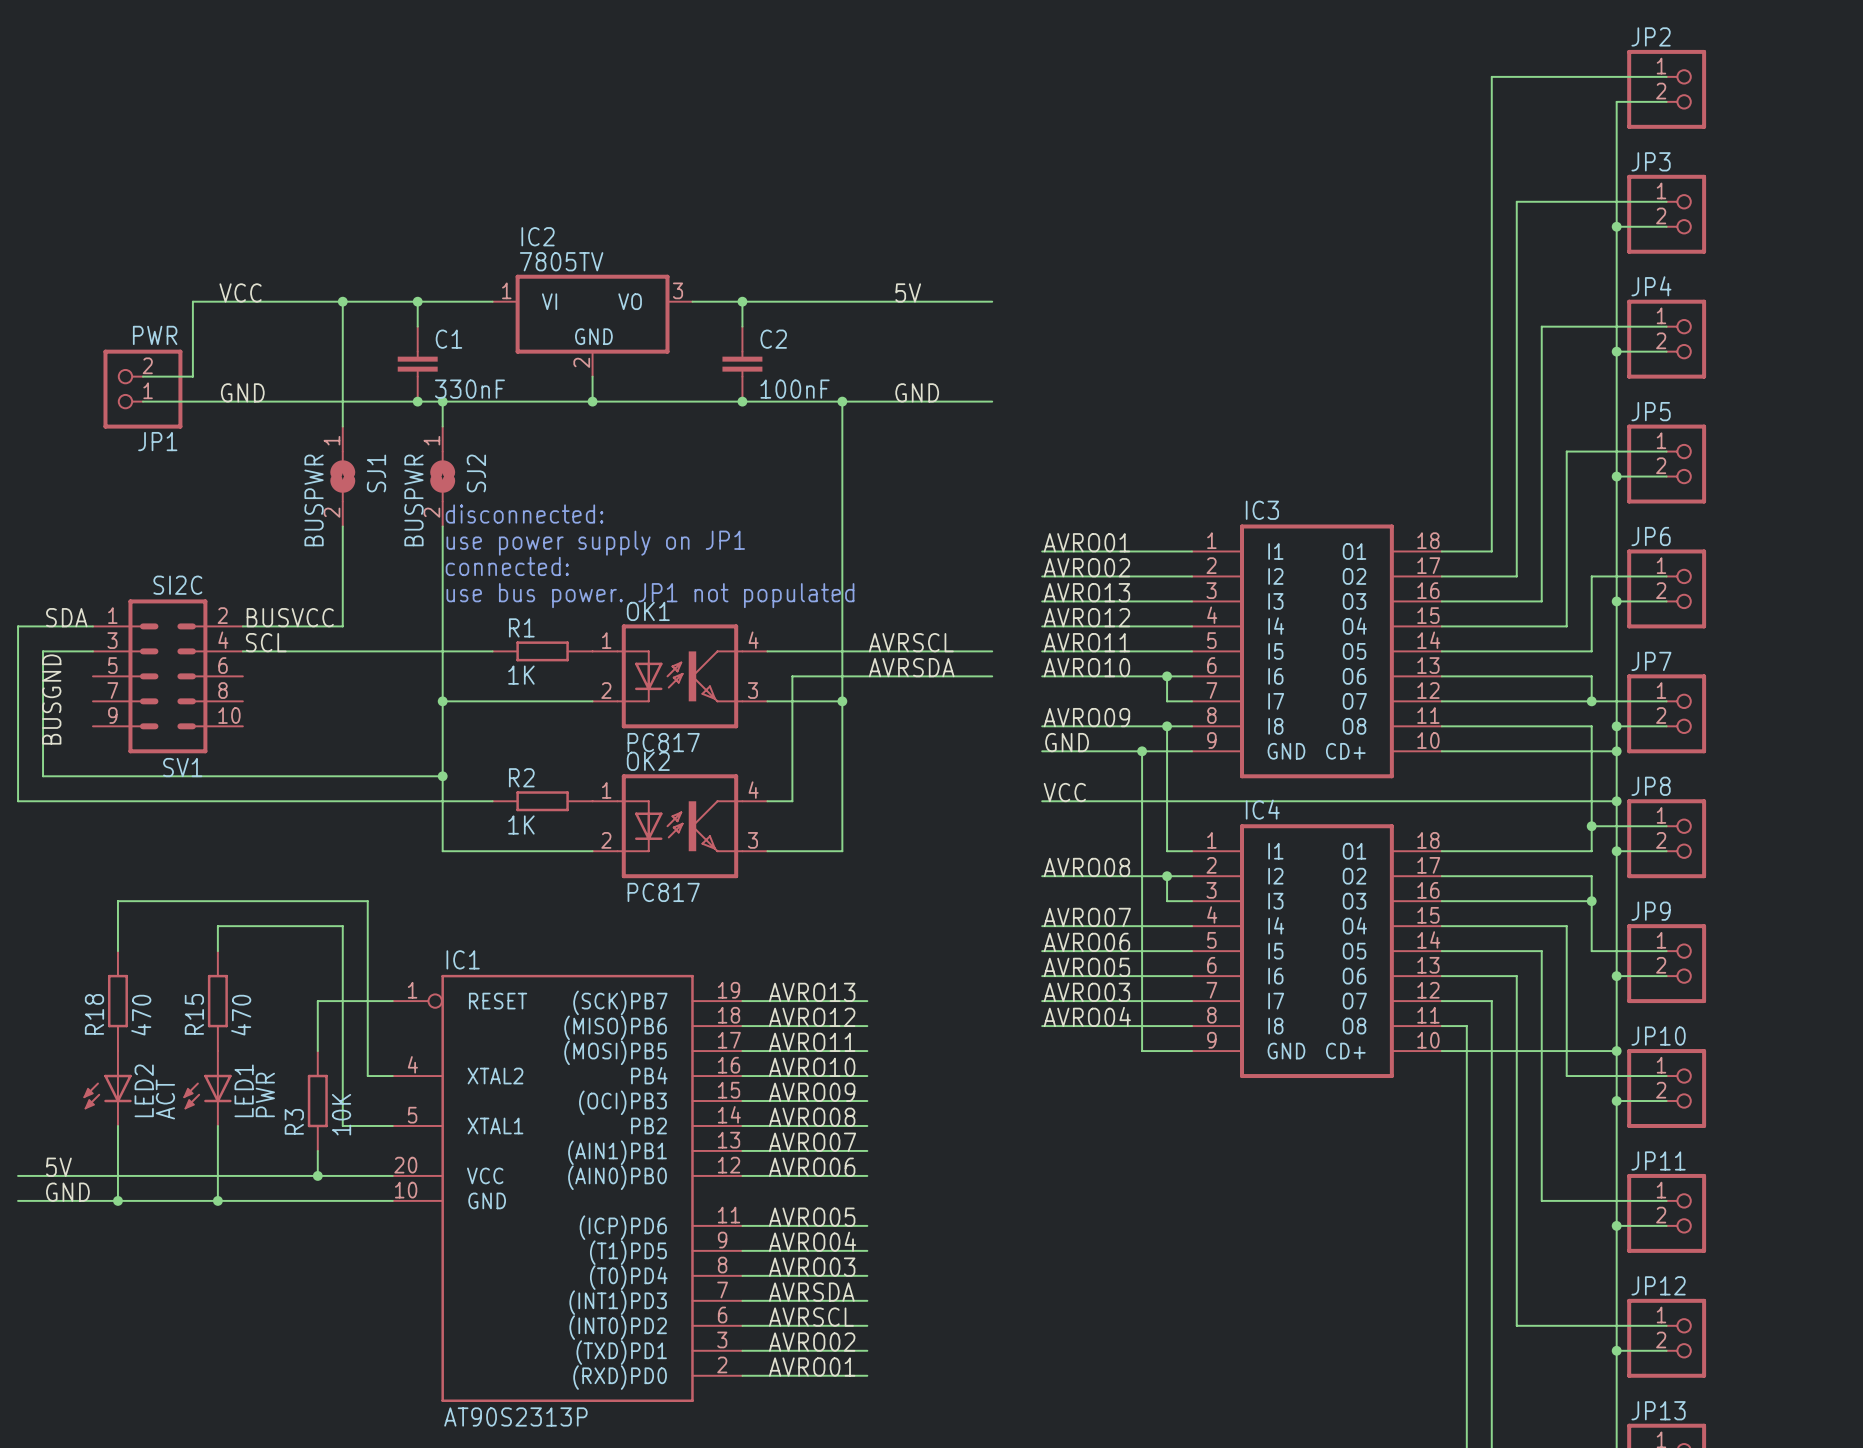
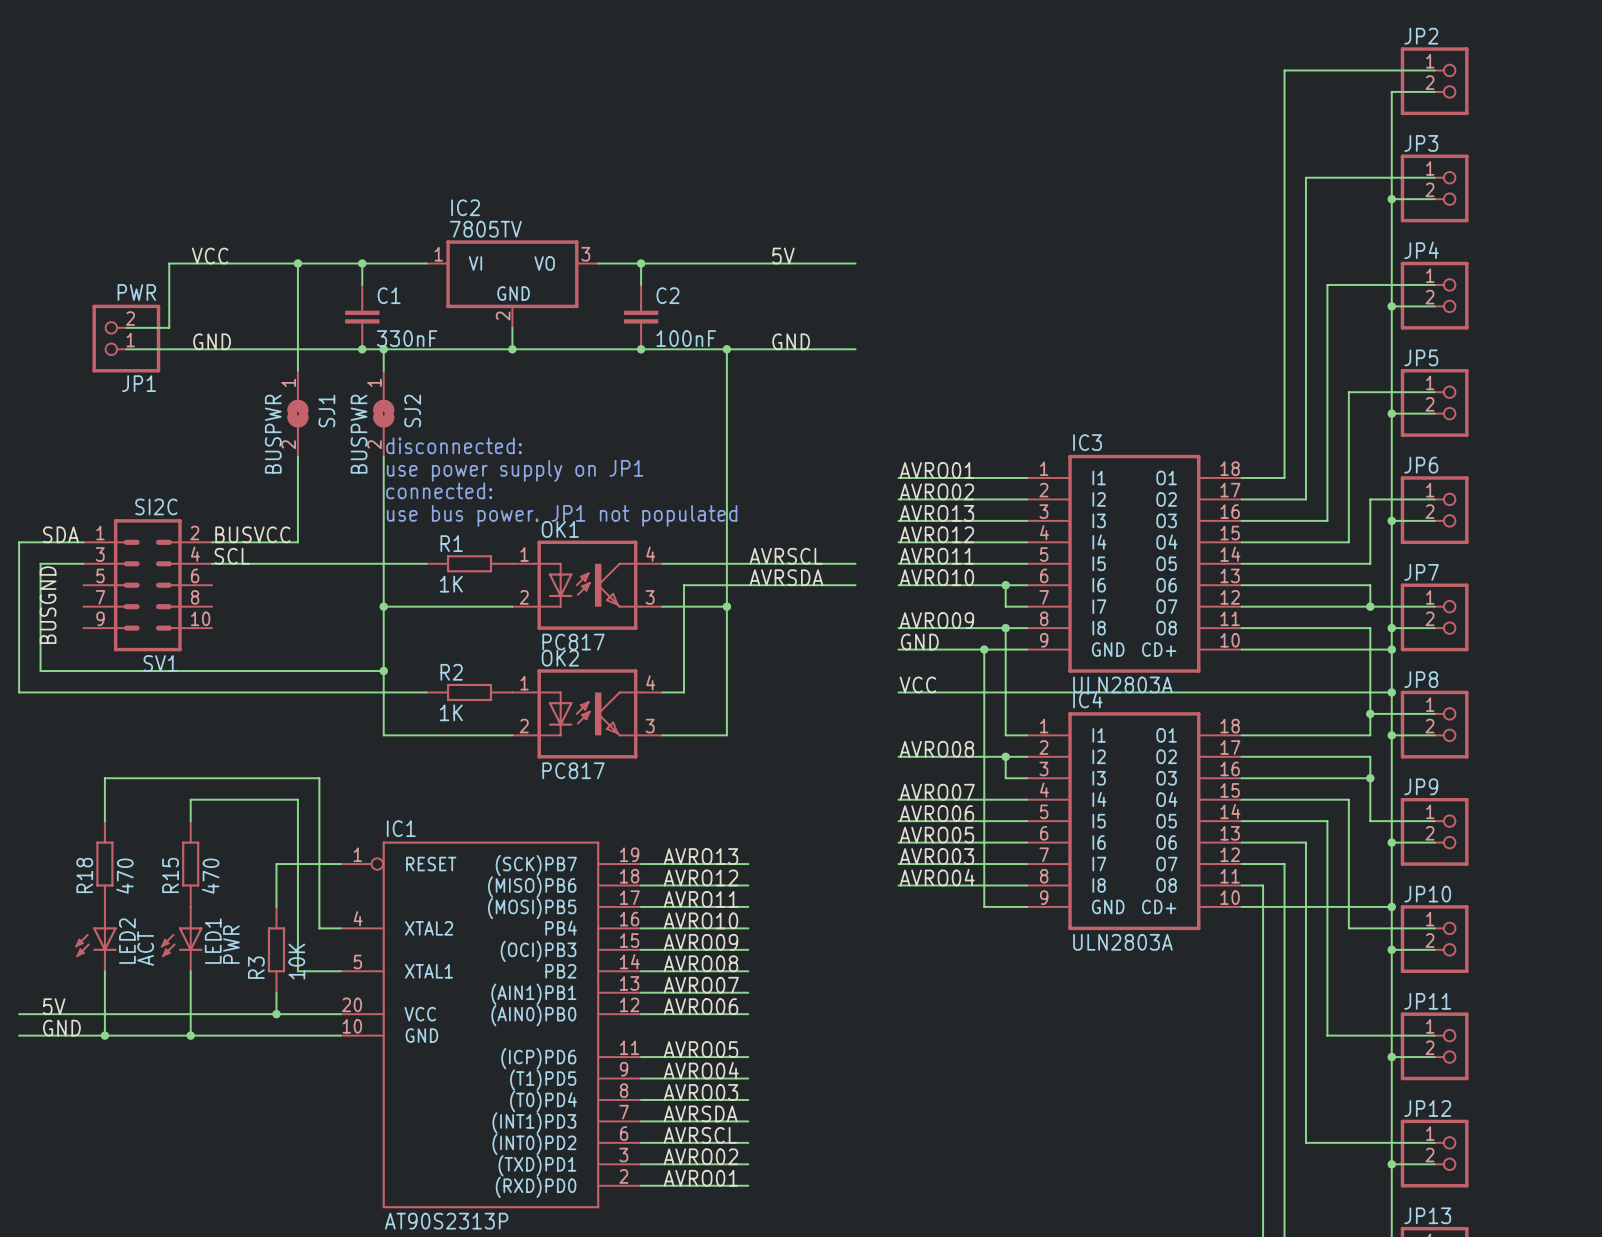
IC3 value: none -> ULN2803A (1122, 684)
IC4 value: none -> ULN2803A (1122, 942)

